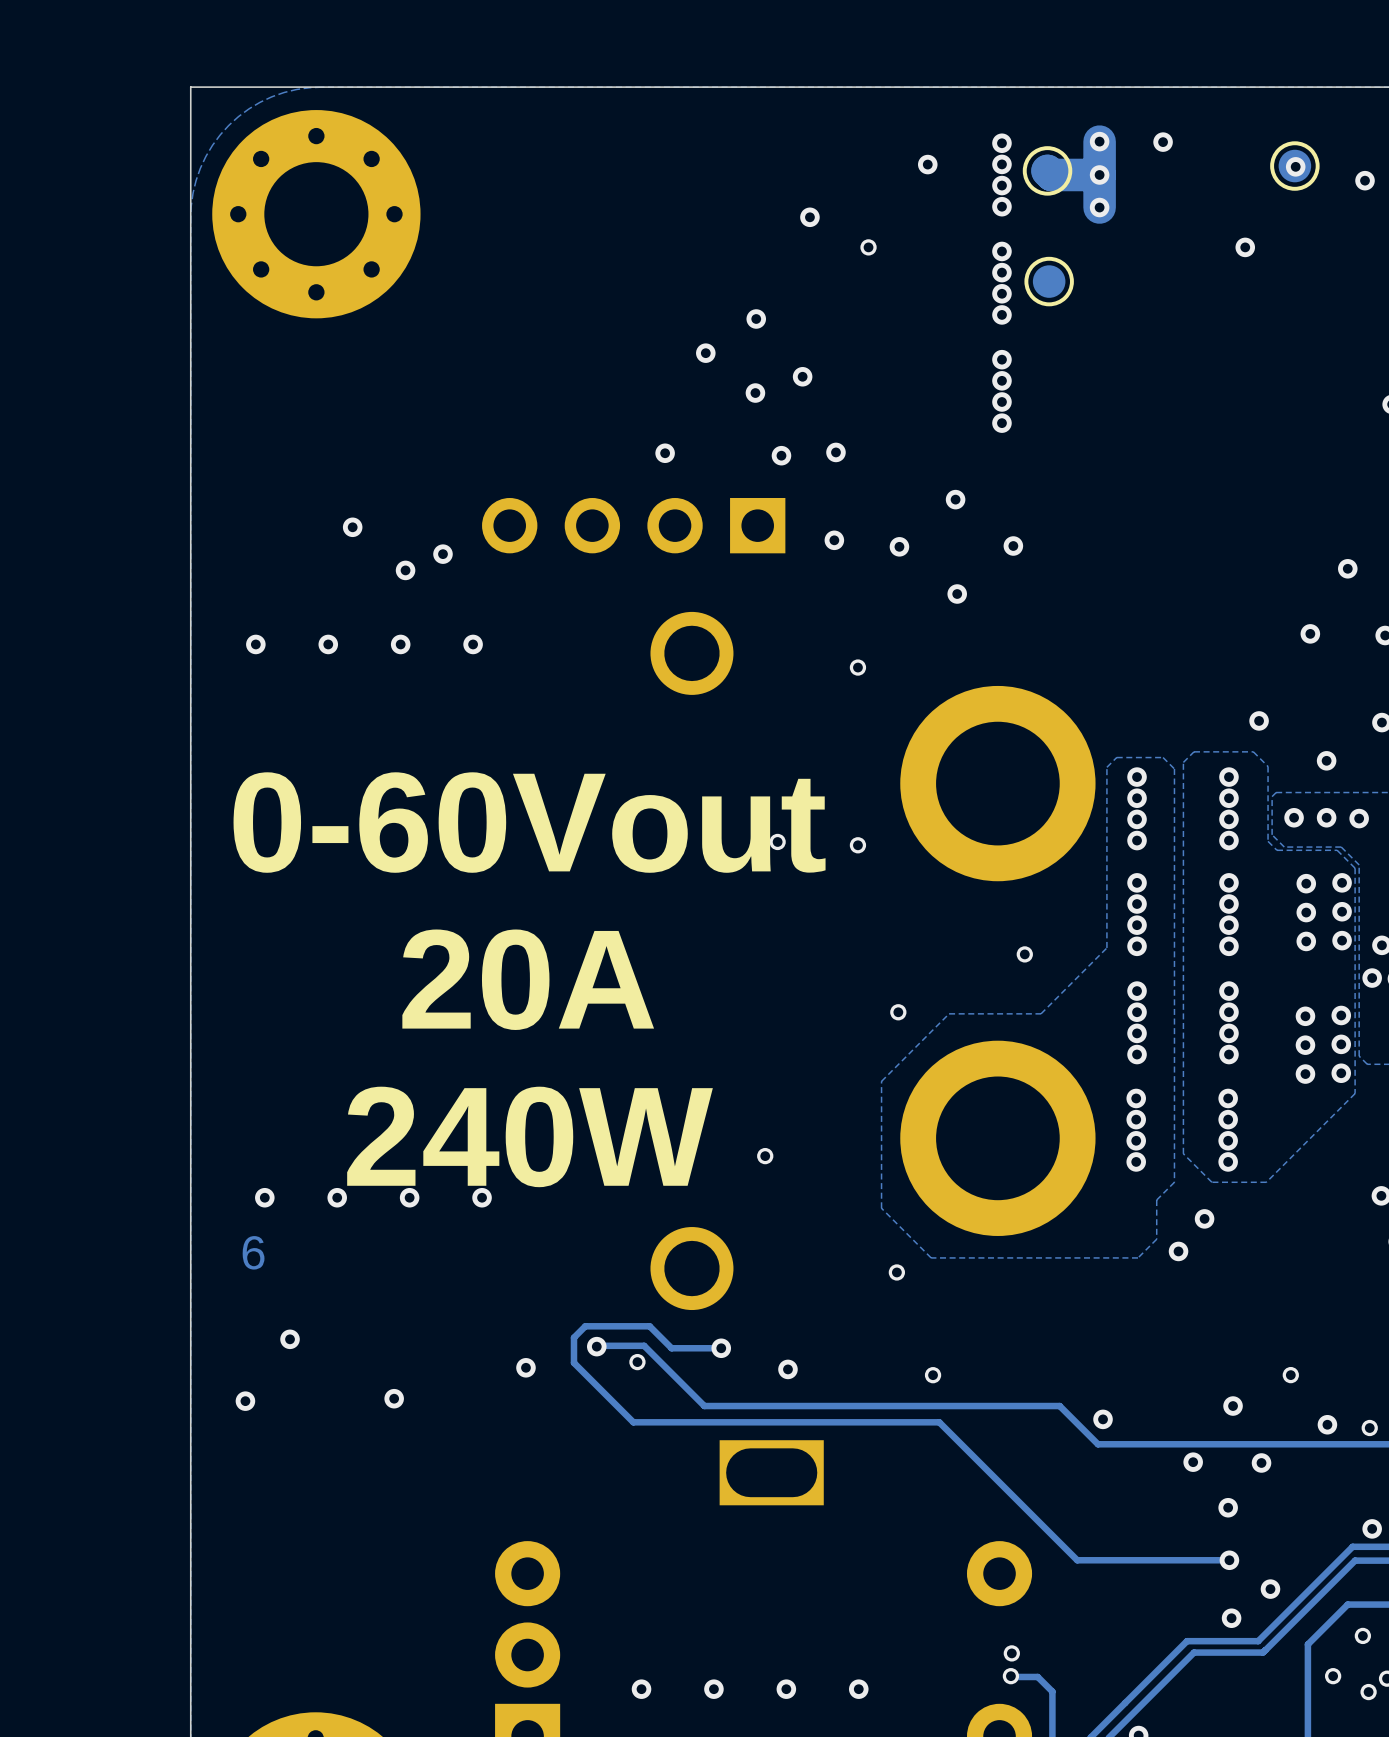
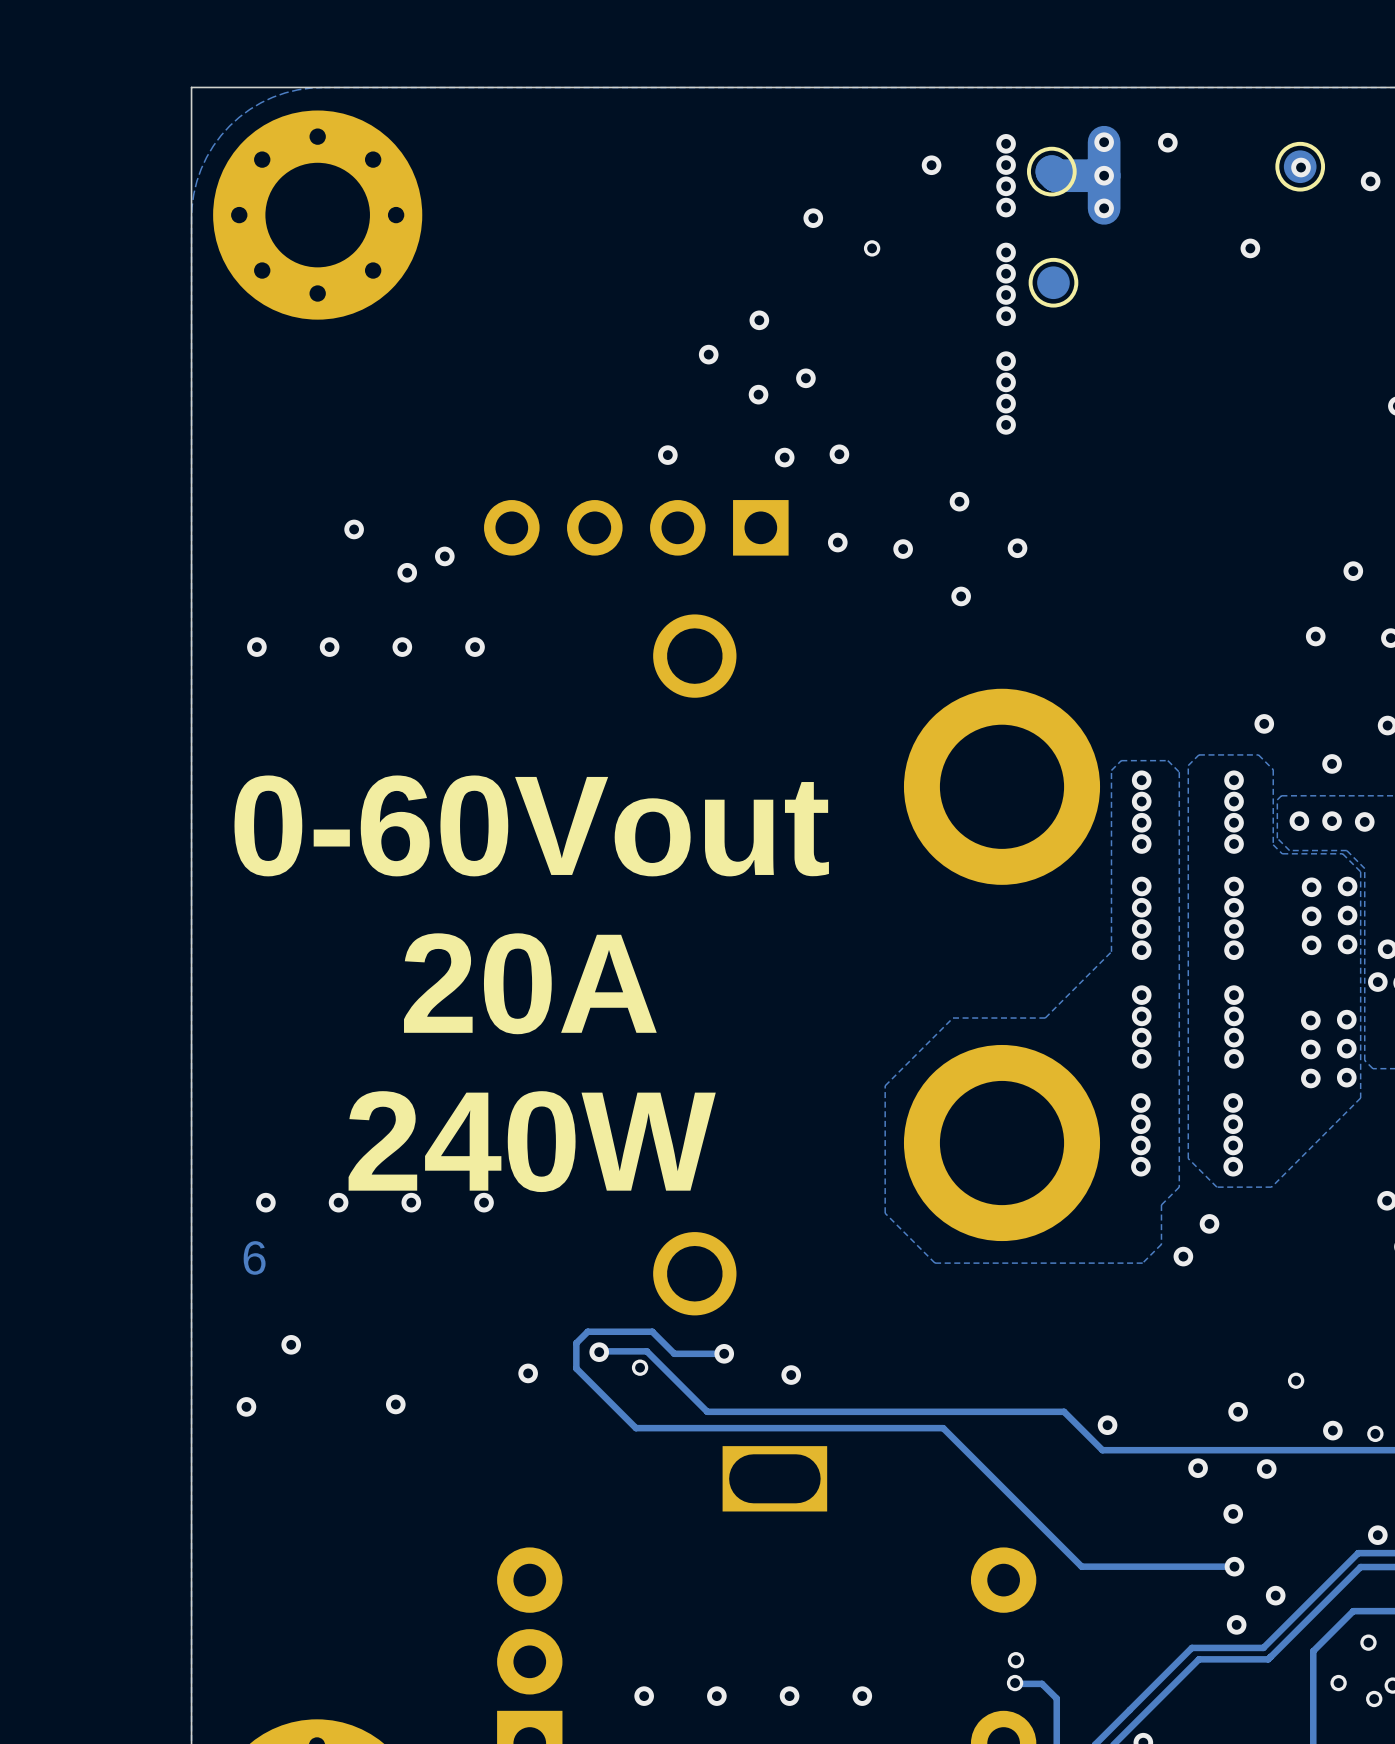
via: (857, 667) -> none
via: (777, 841) -> none
via: (857, 845) -> none
via: (1024, 954) -> none
via: (898, 1012) -> none
via: (765, 1156) -> none
via: (896, 1272) -> none
via: (933, 1375) -> none

